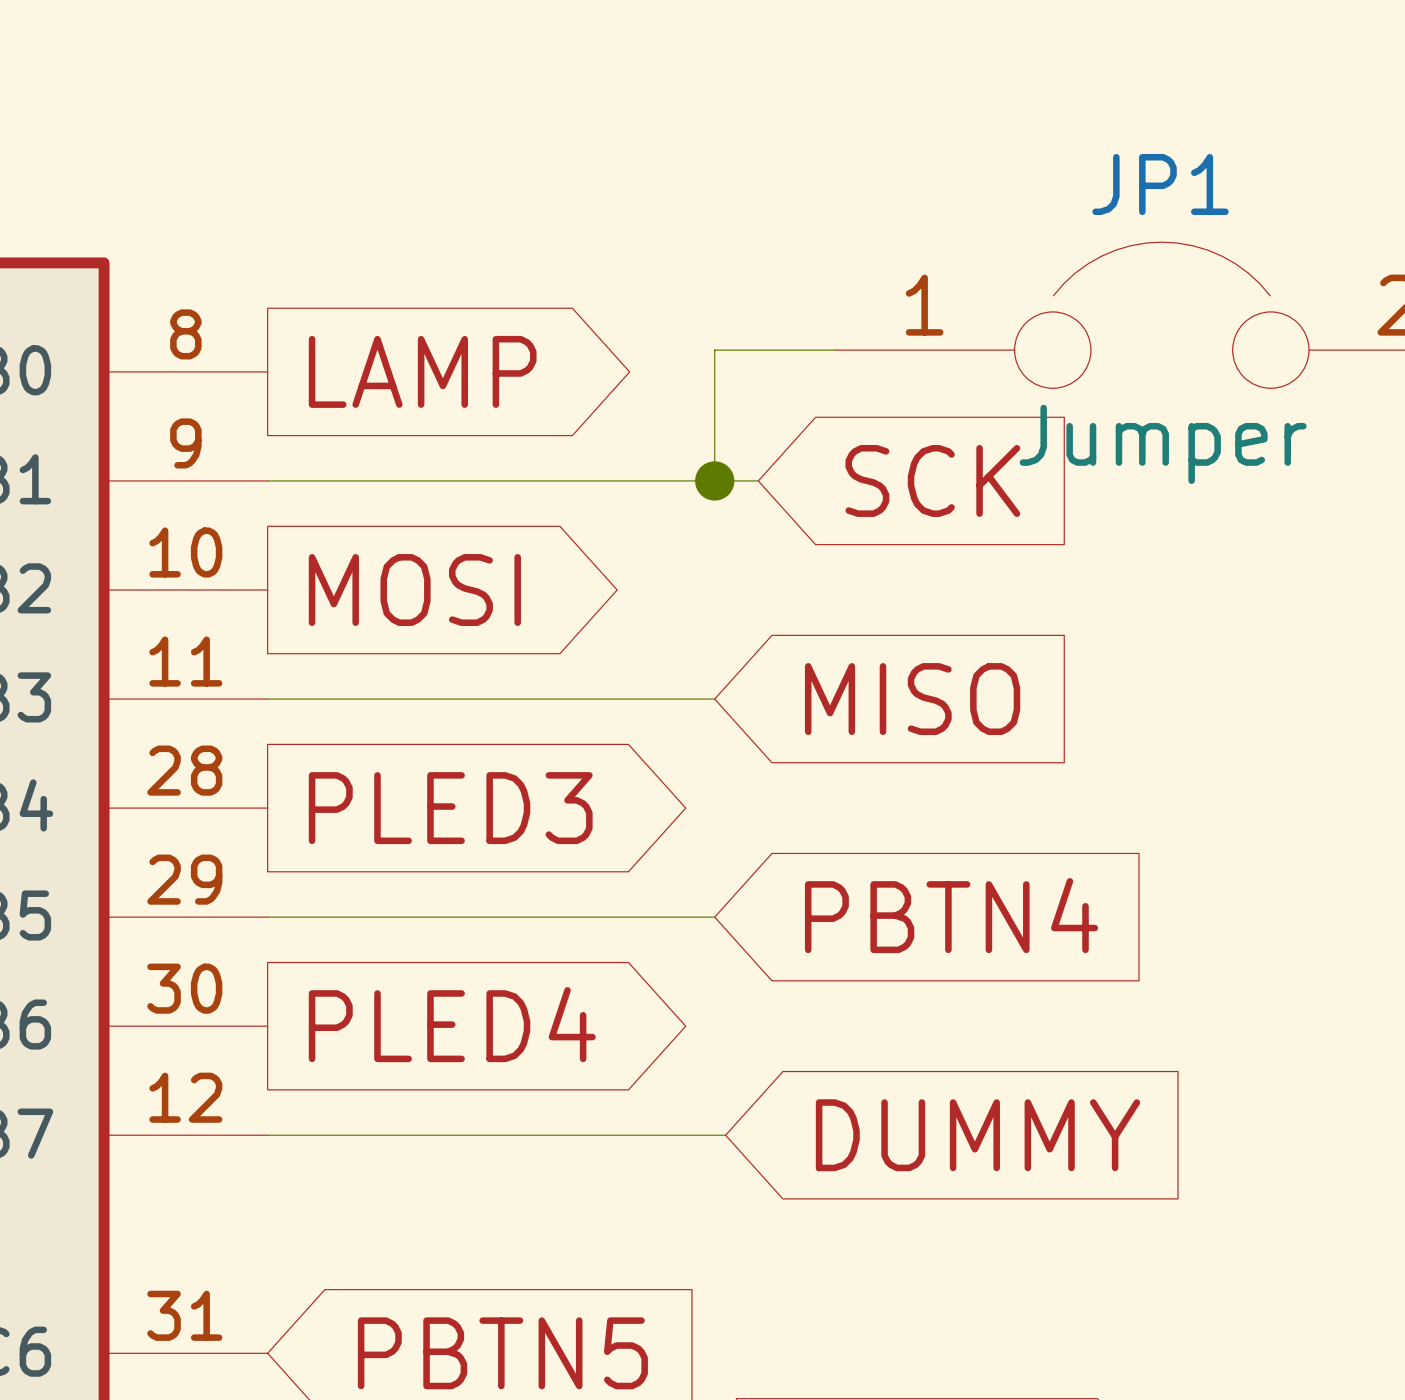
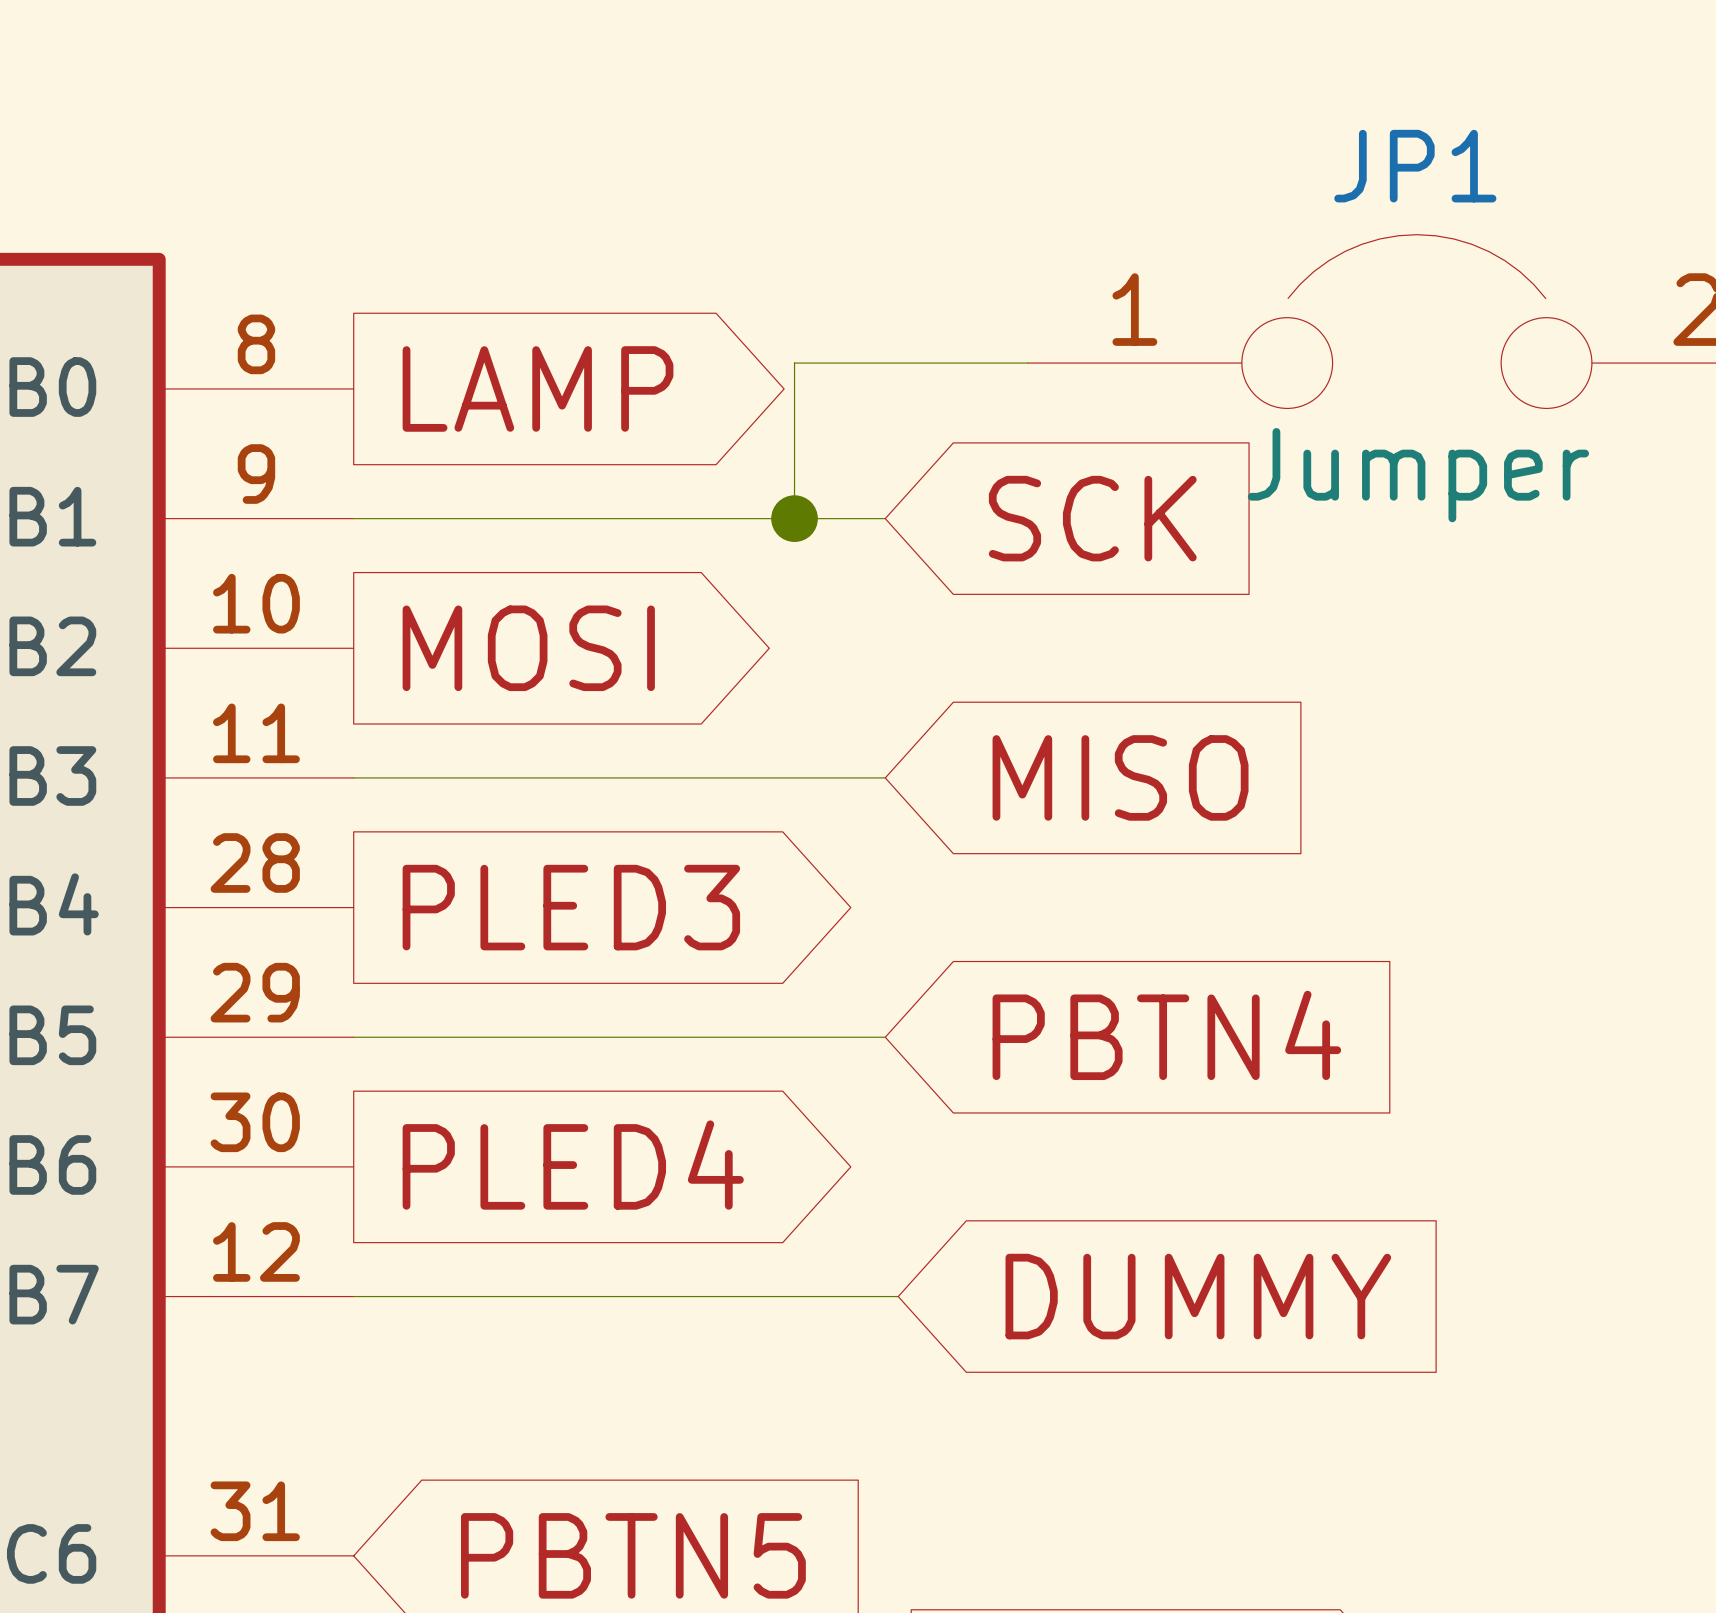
wire: (714, 350) (714, 480) (758, 480) -> (885, 363) (794, 363) (794, 518)
junction position: (714, 480) -> (794, 518)
global label position: SCK (932, 480) -> SCK (1092, 518)

